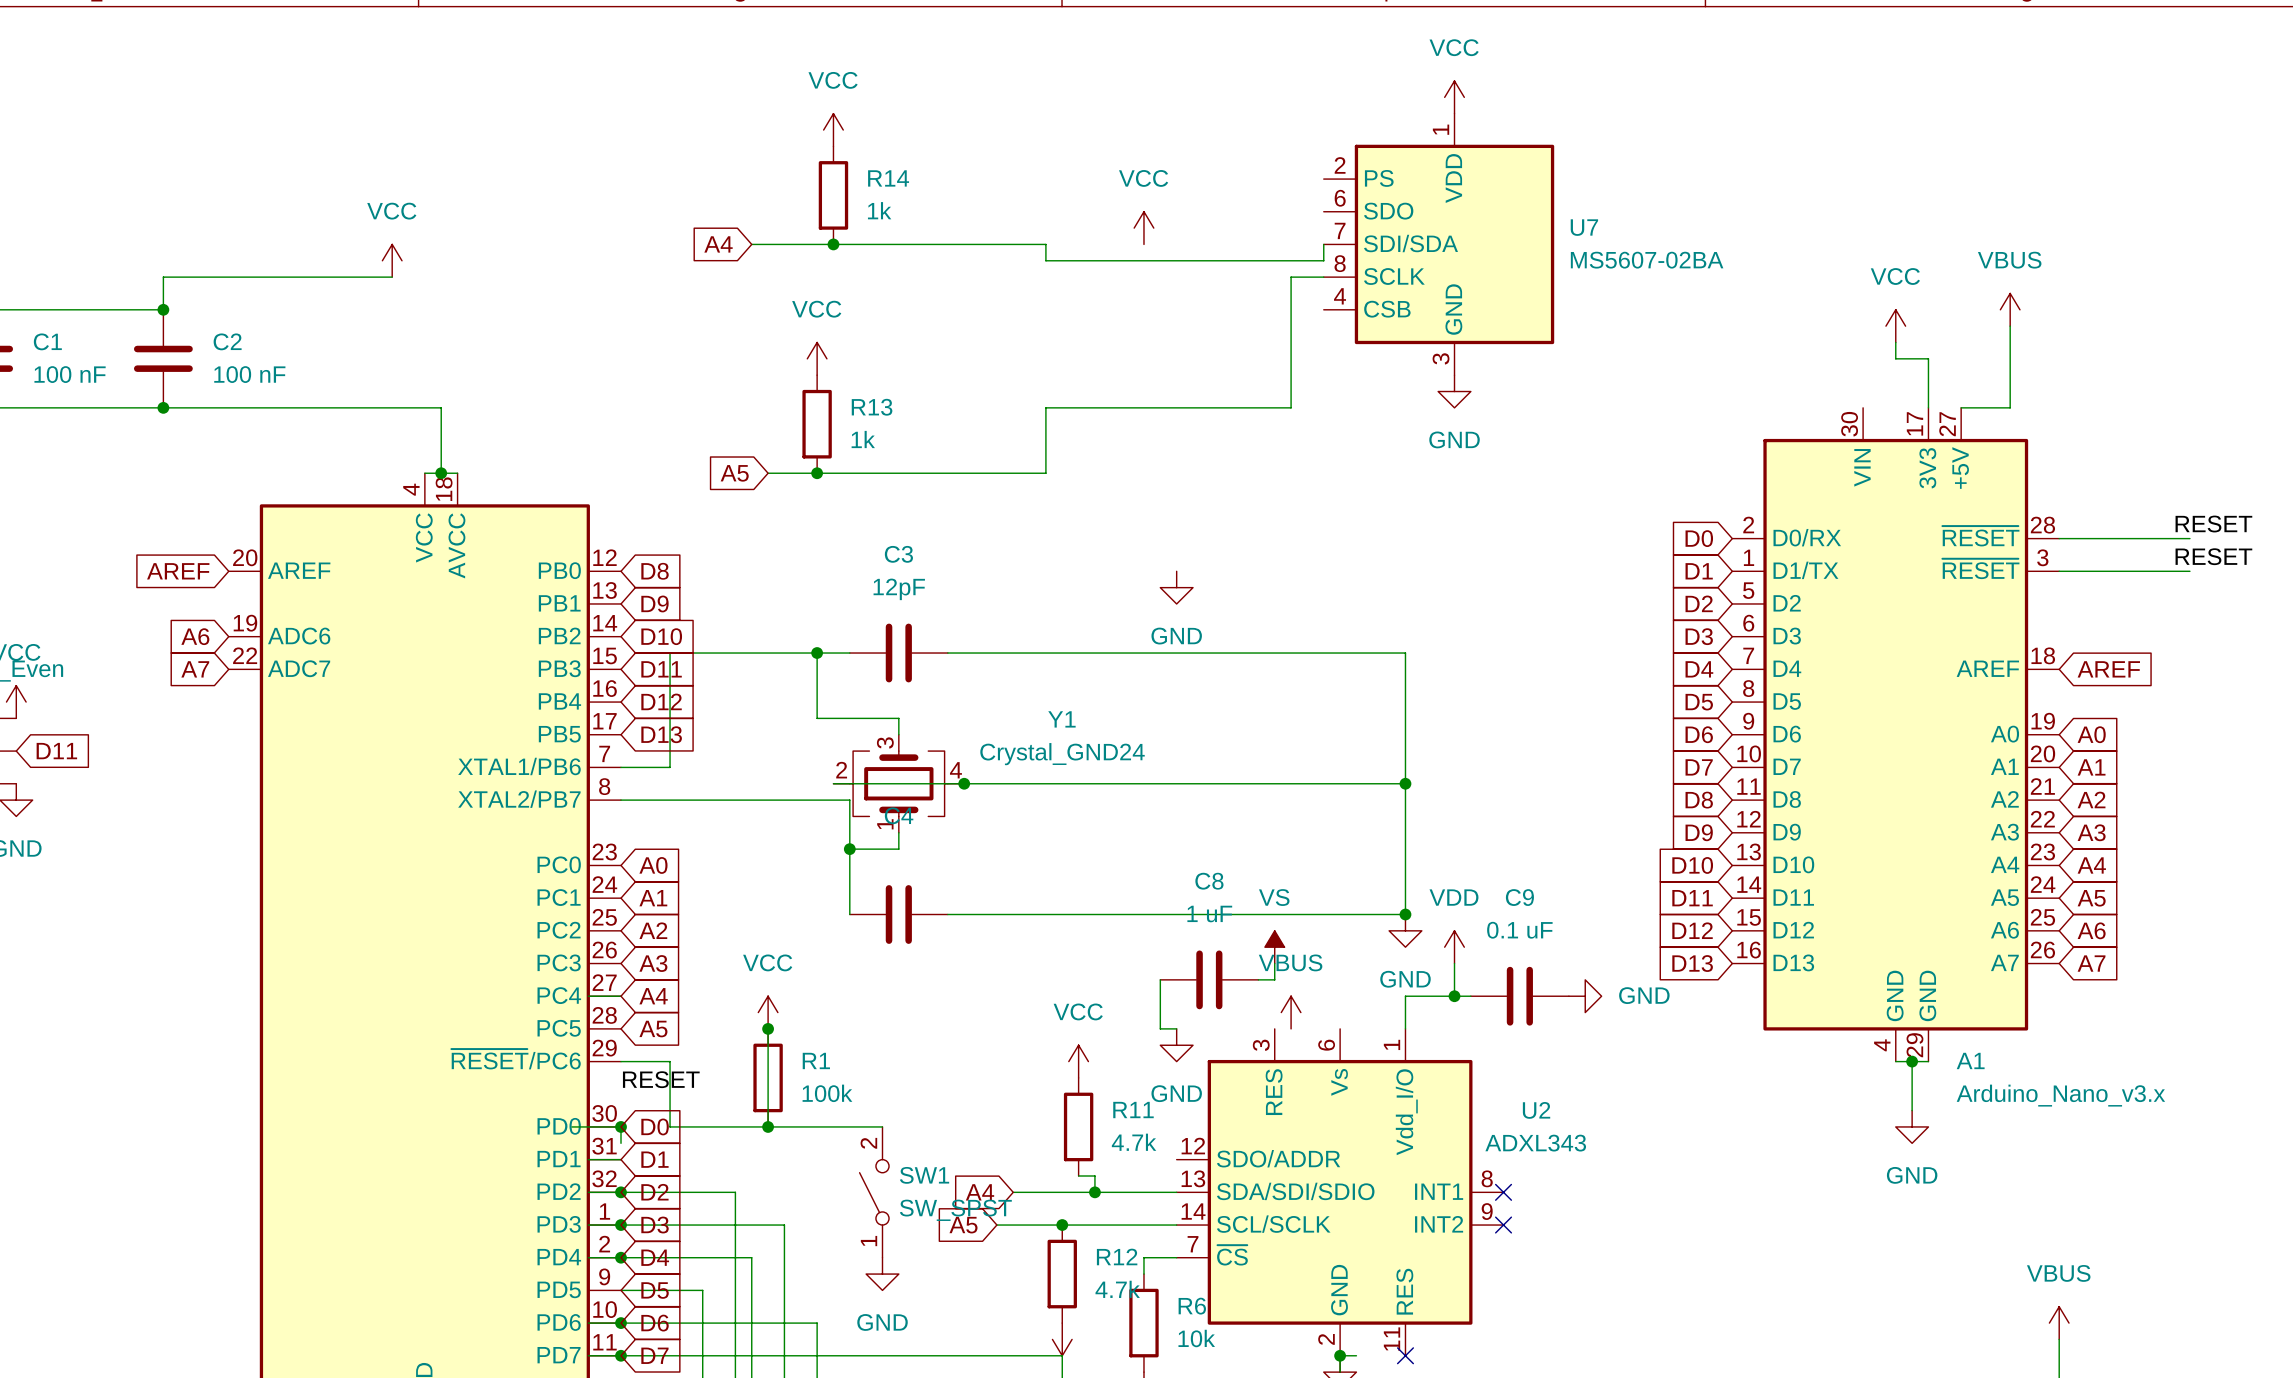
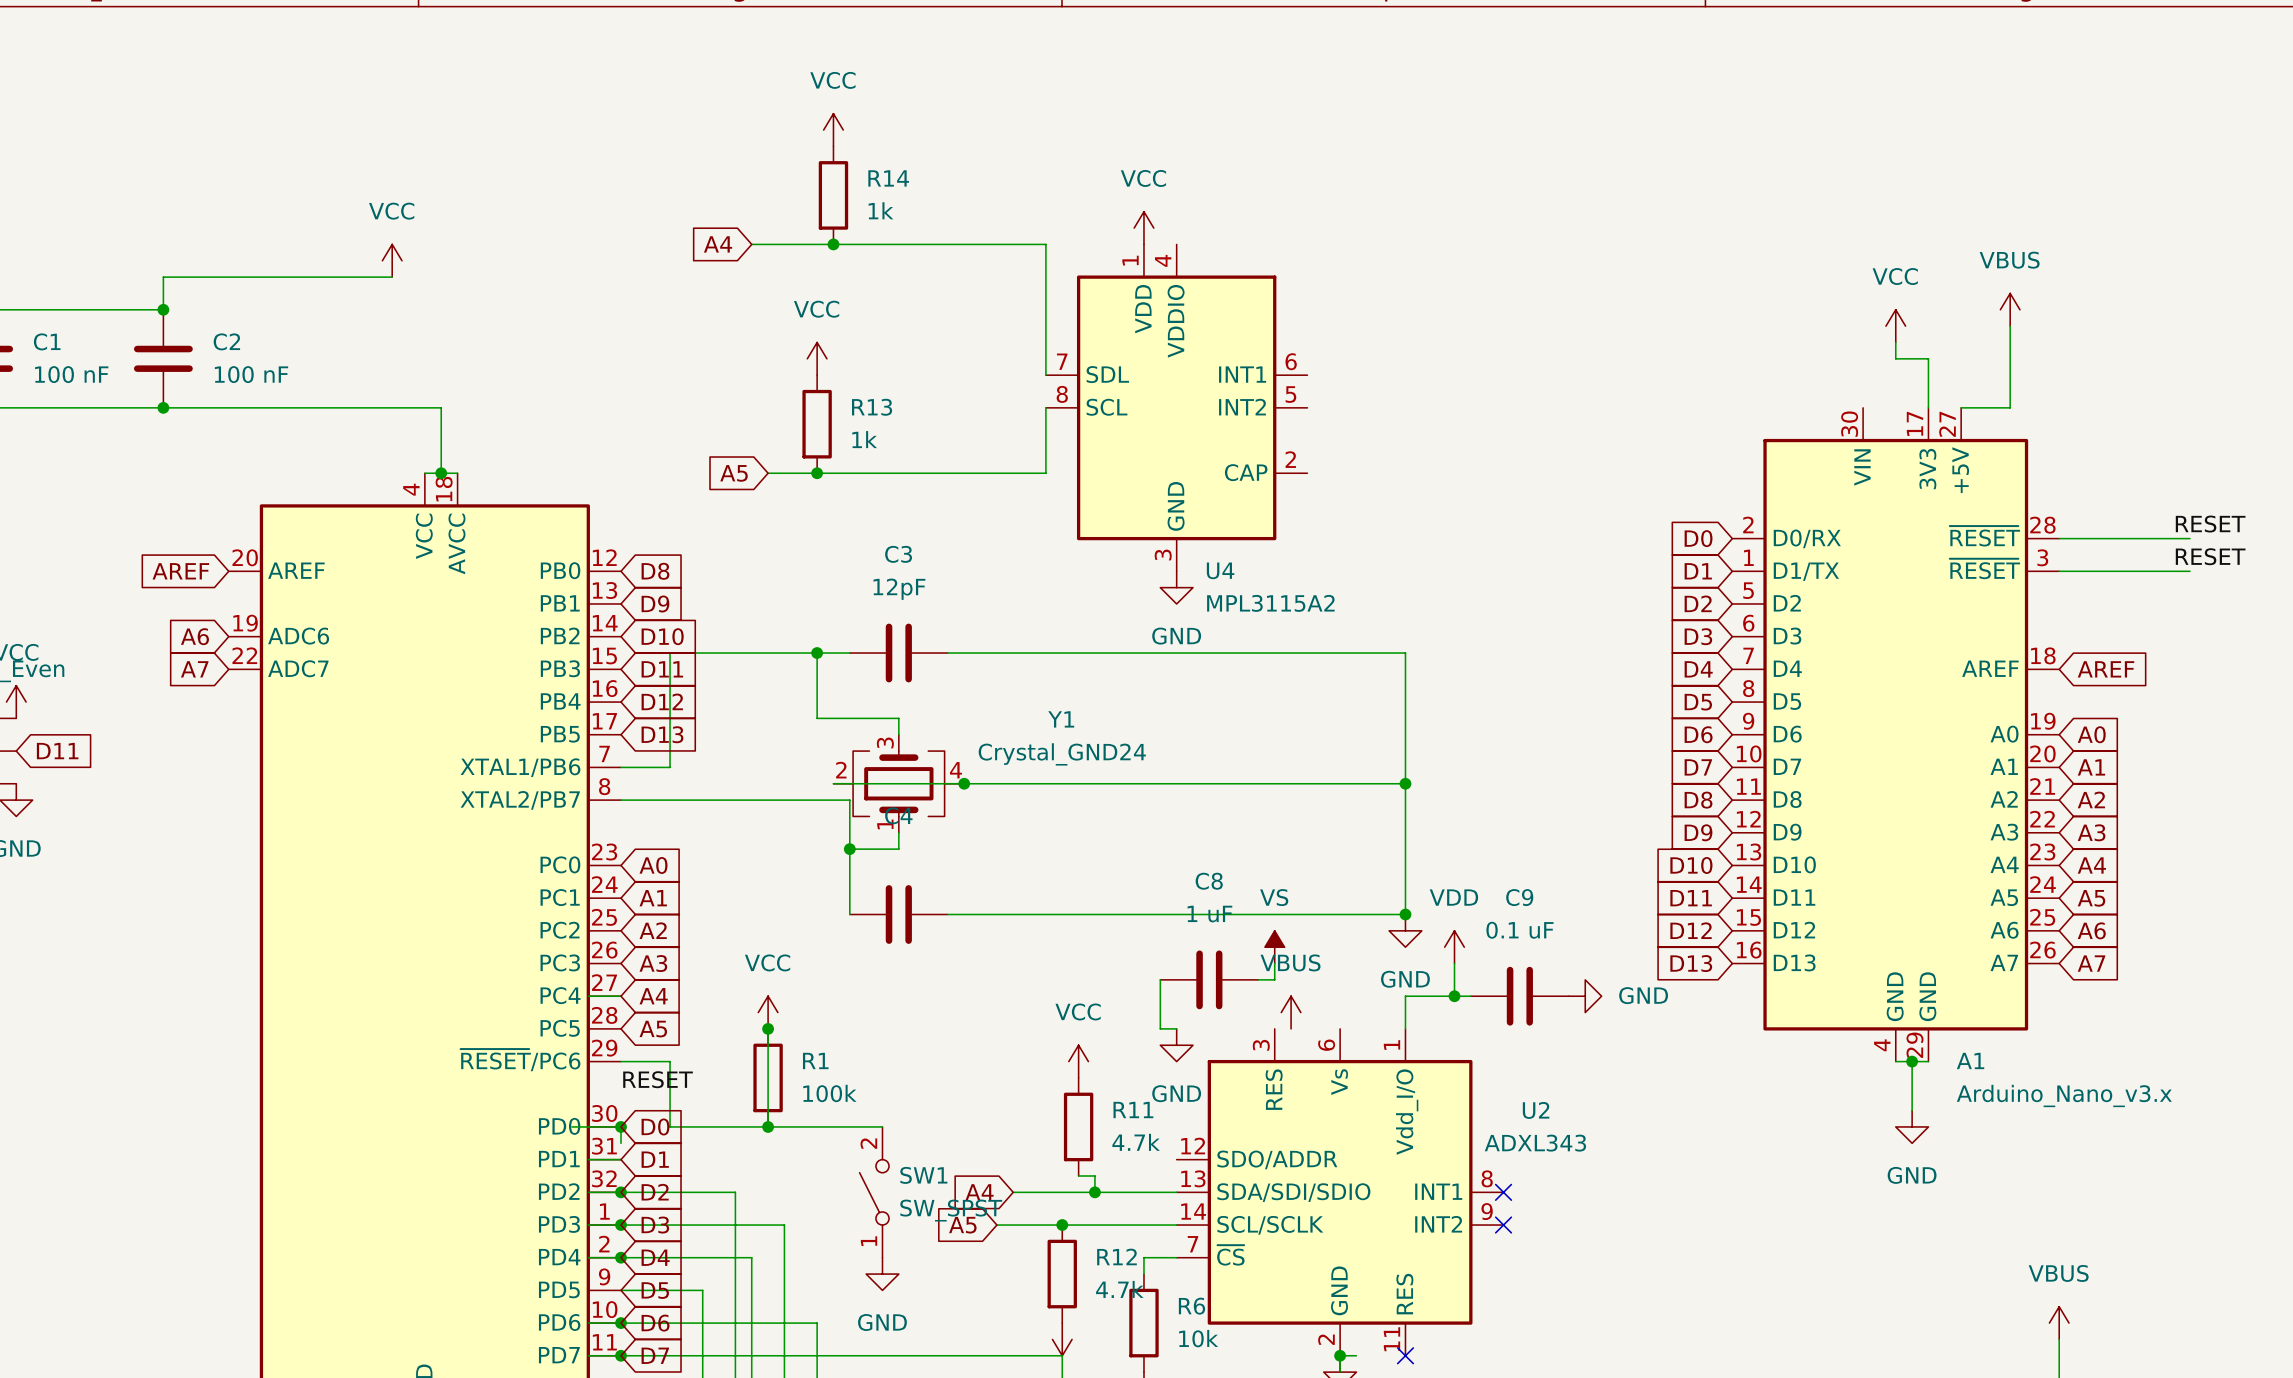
power symbol: VCC (1454, 97) -> none
wire: (1323, 244) (1323, 260) (1045, 260) -> (1045, 375) (1045, 260)
U7: MS5607-02BA (1438, 244) -> none
wire: (1323, 277) (1291, 277) (1291, 407) (1045, 407) -> none
power symbol: GND (1454, 391) -> none
U4: none -> MPL3115A2 (1176, 407)

